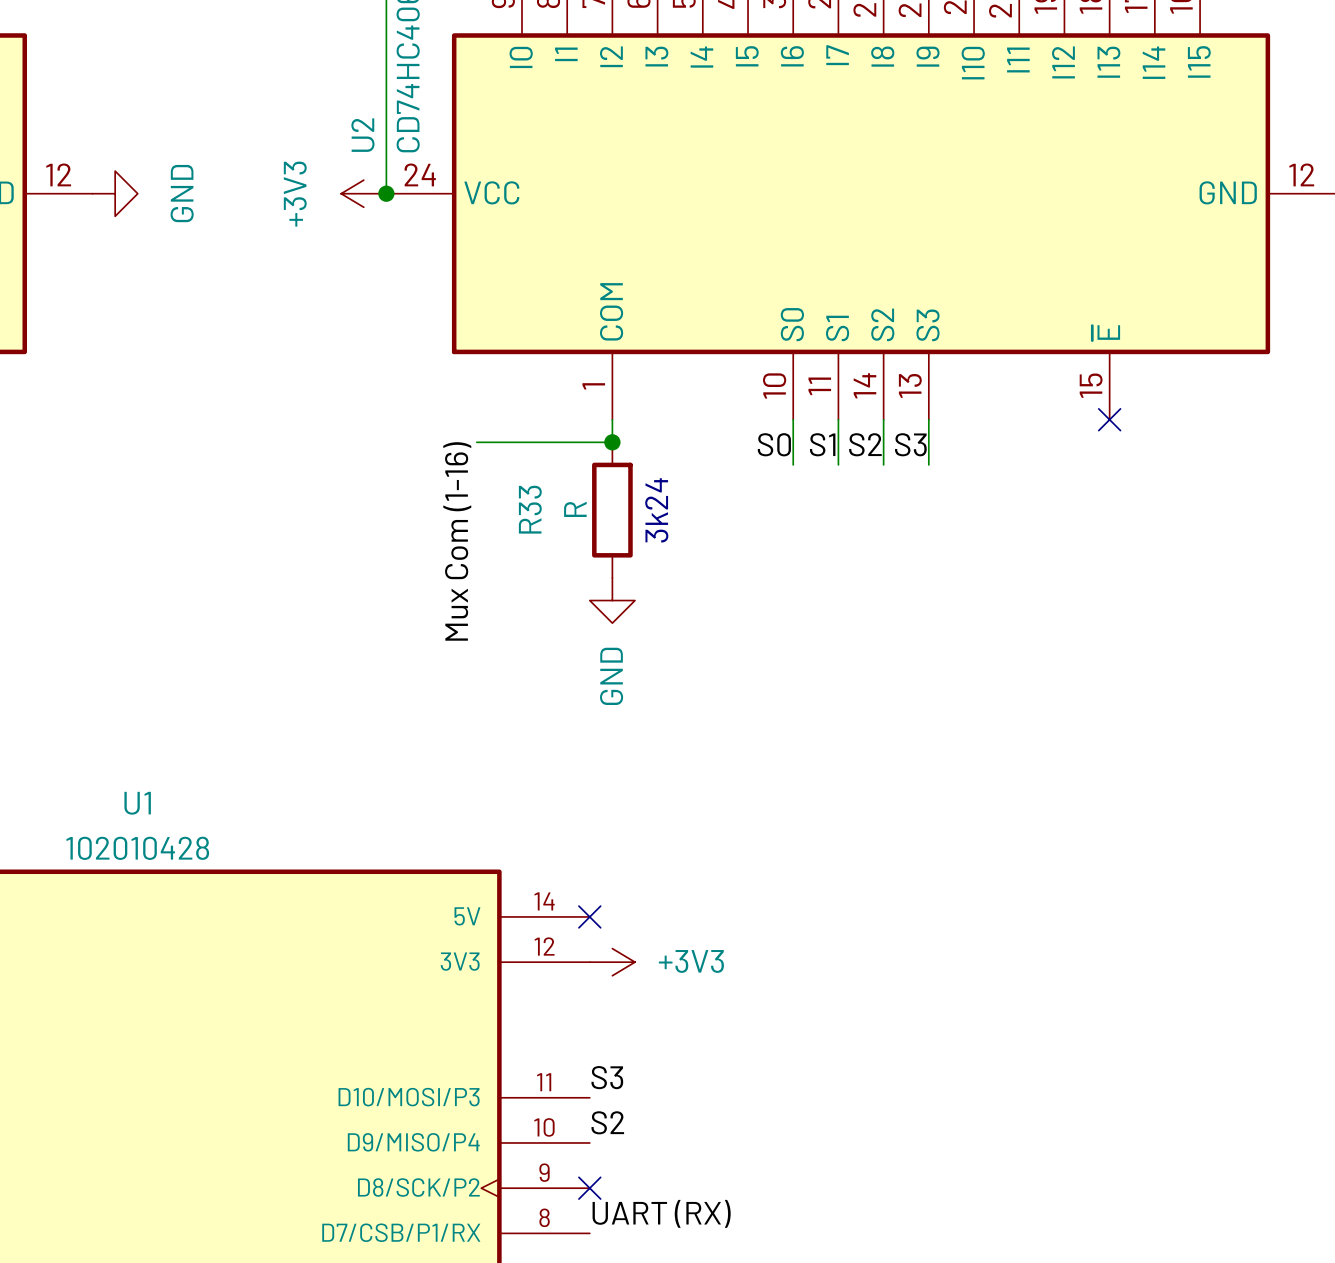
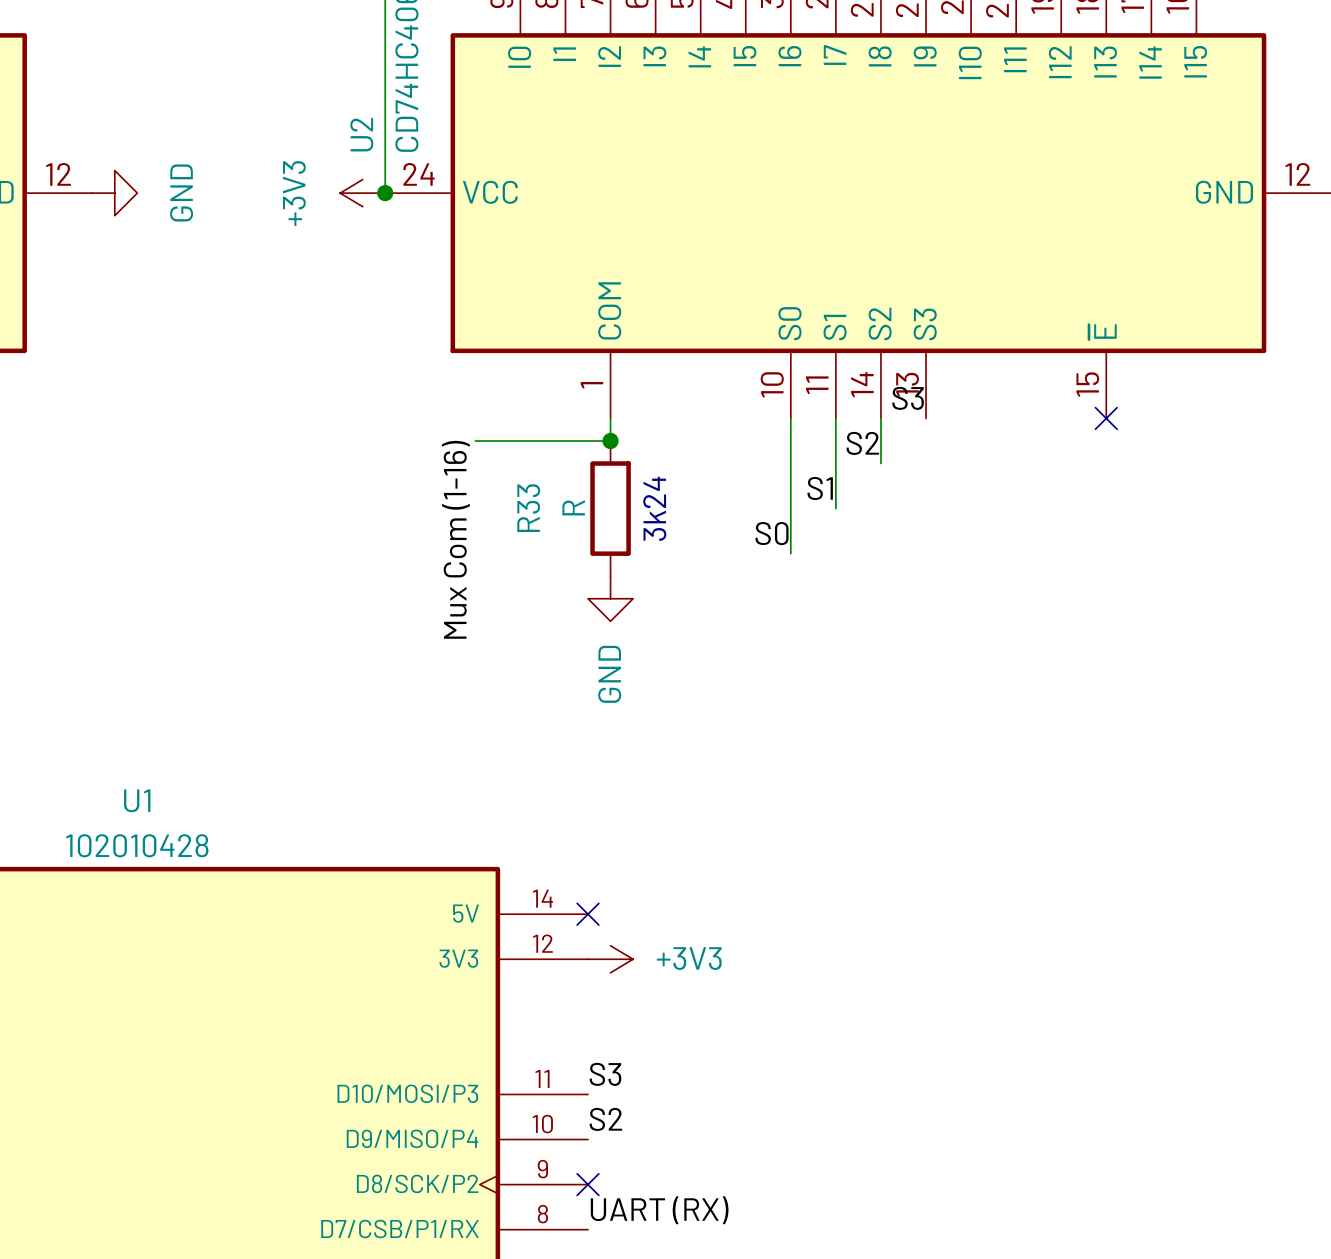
wire: (928, 419) (928, 464) -> (835, 463) (835, 508)
label position: S0 (774, 444) -> S0 (772, 533)
label position: S1 (822, 444) -> S1 (820, 488)
label position: S3 (910, 444) -> S3 (908, 398)
wire: none -> (790, 463) (790, 553)

